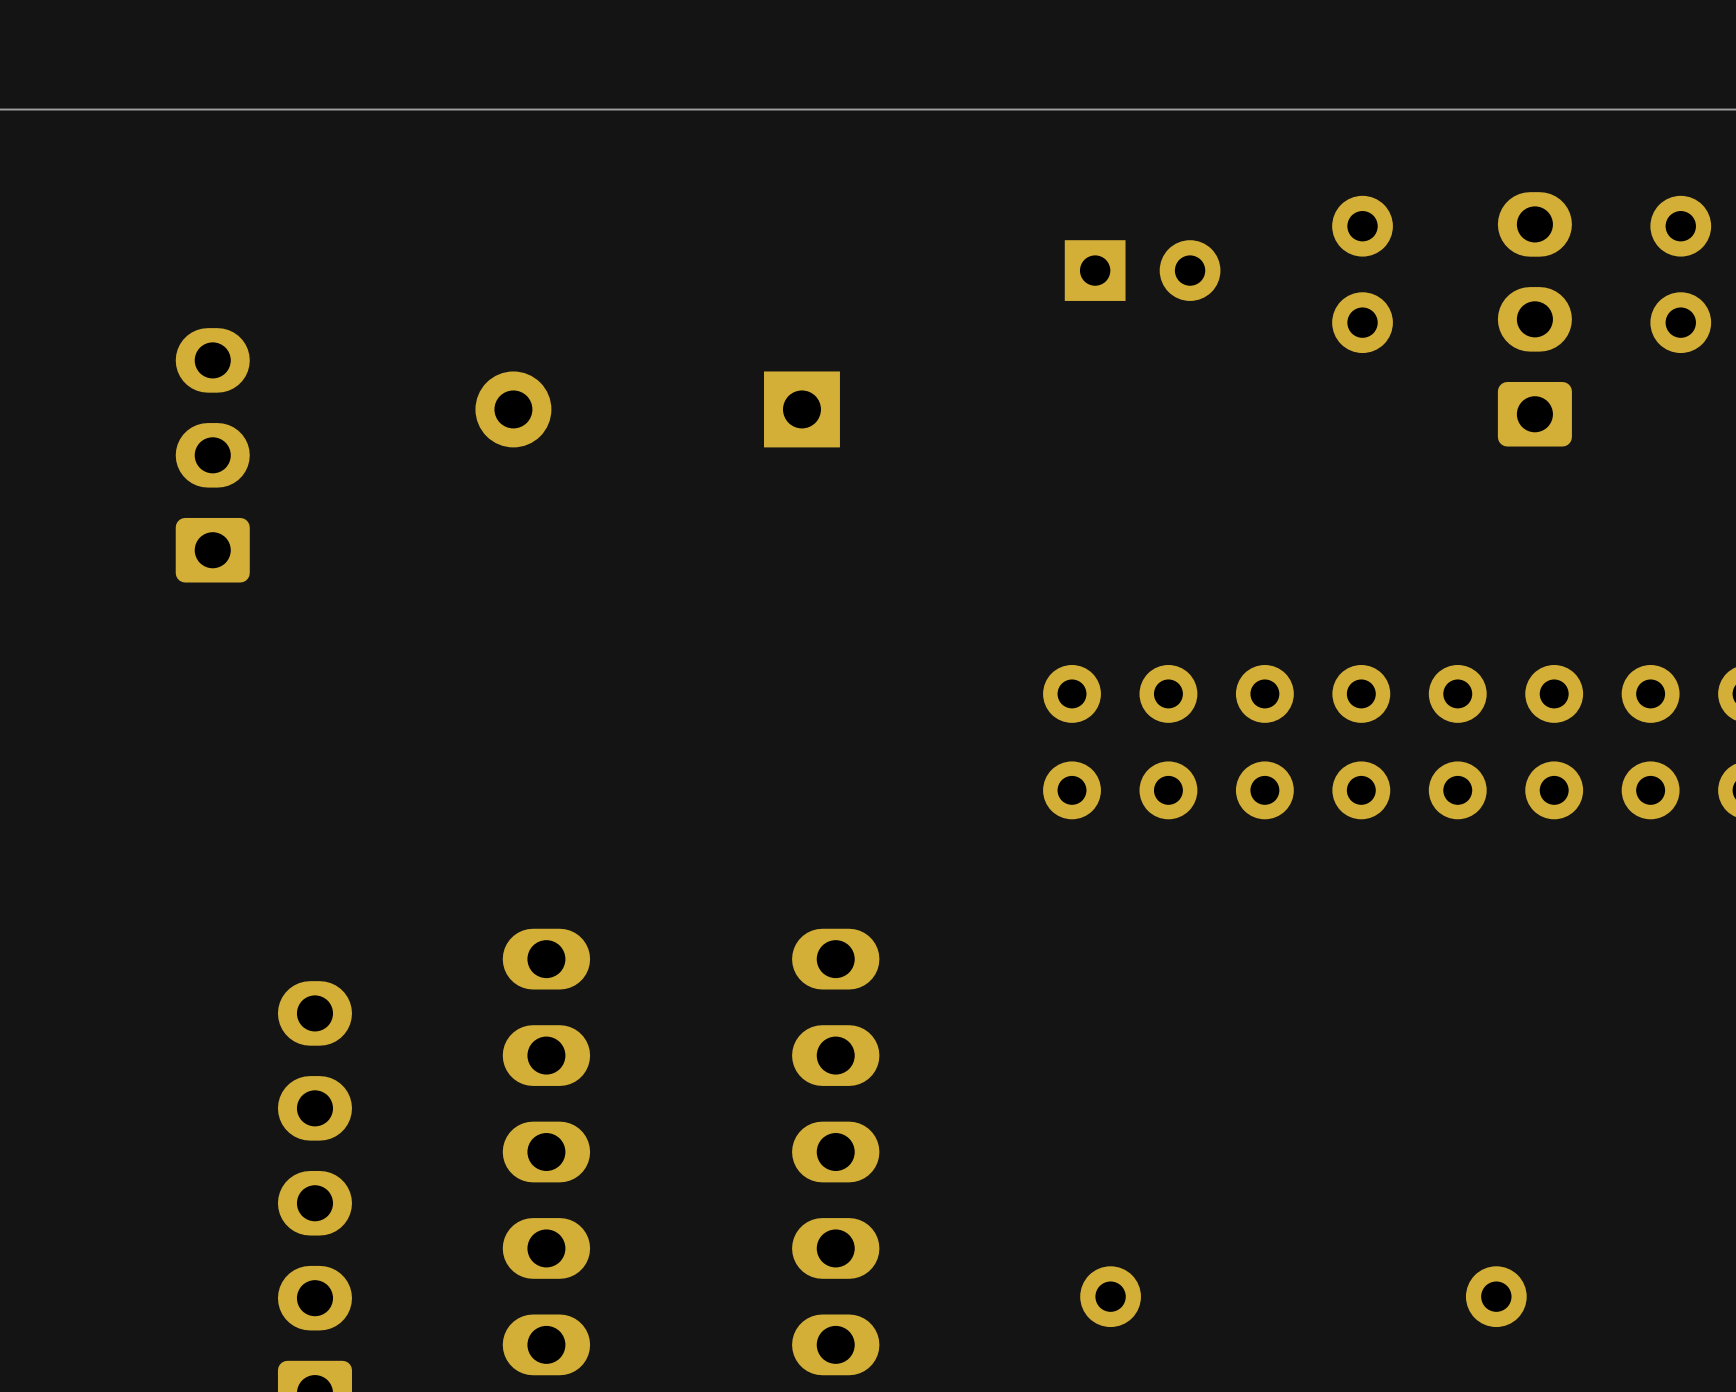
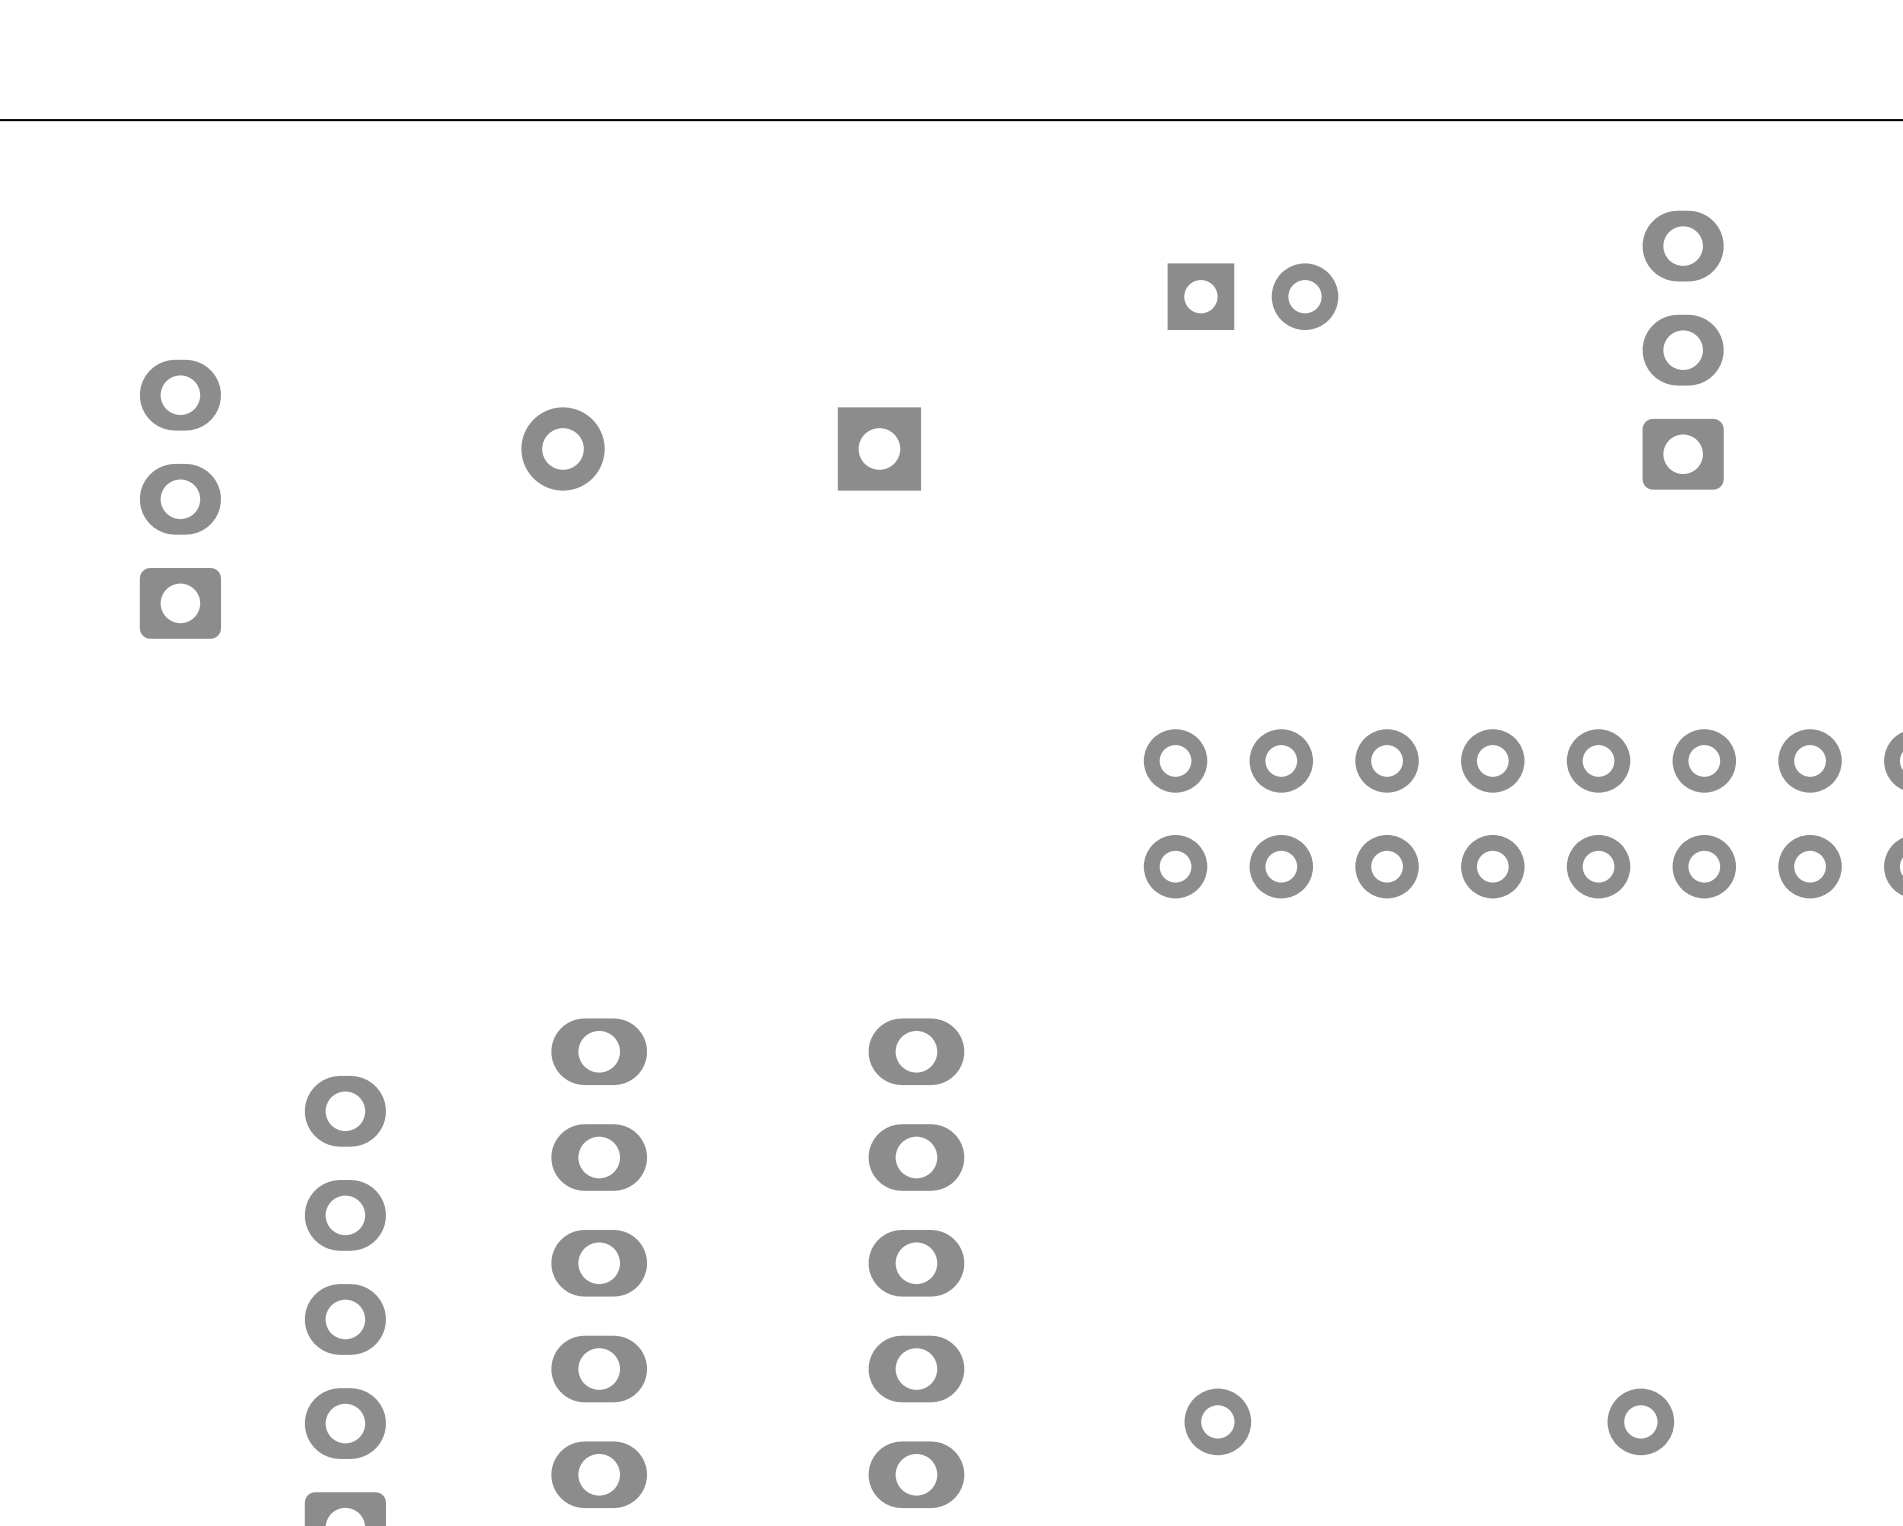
part: (1362, 274) -> none
part: (1680, 274) -> none
part position: (212, 455) -> (180, 499)

